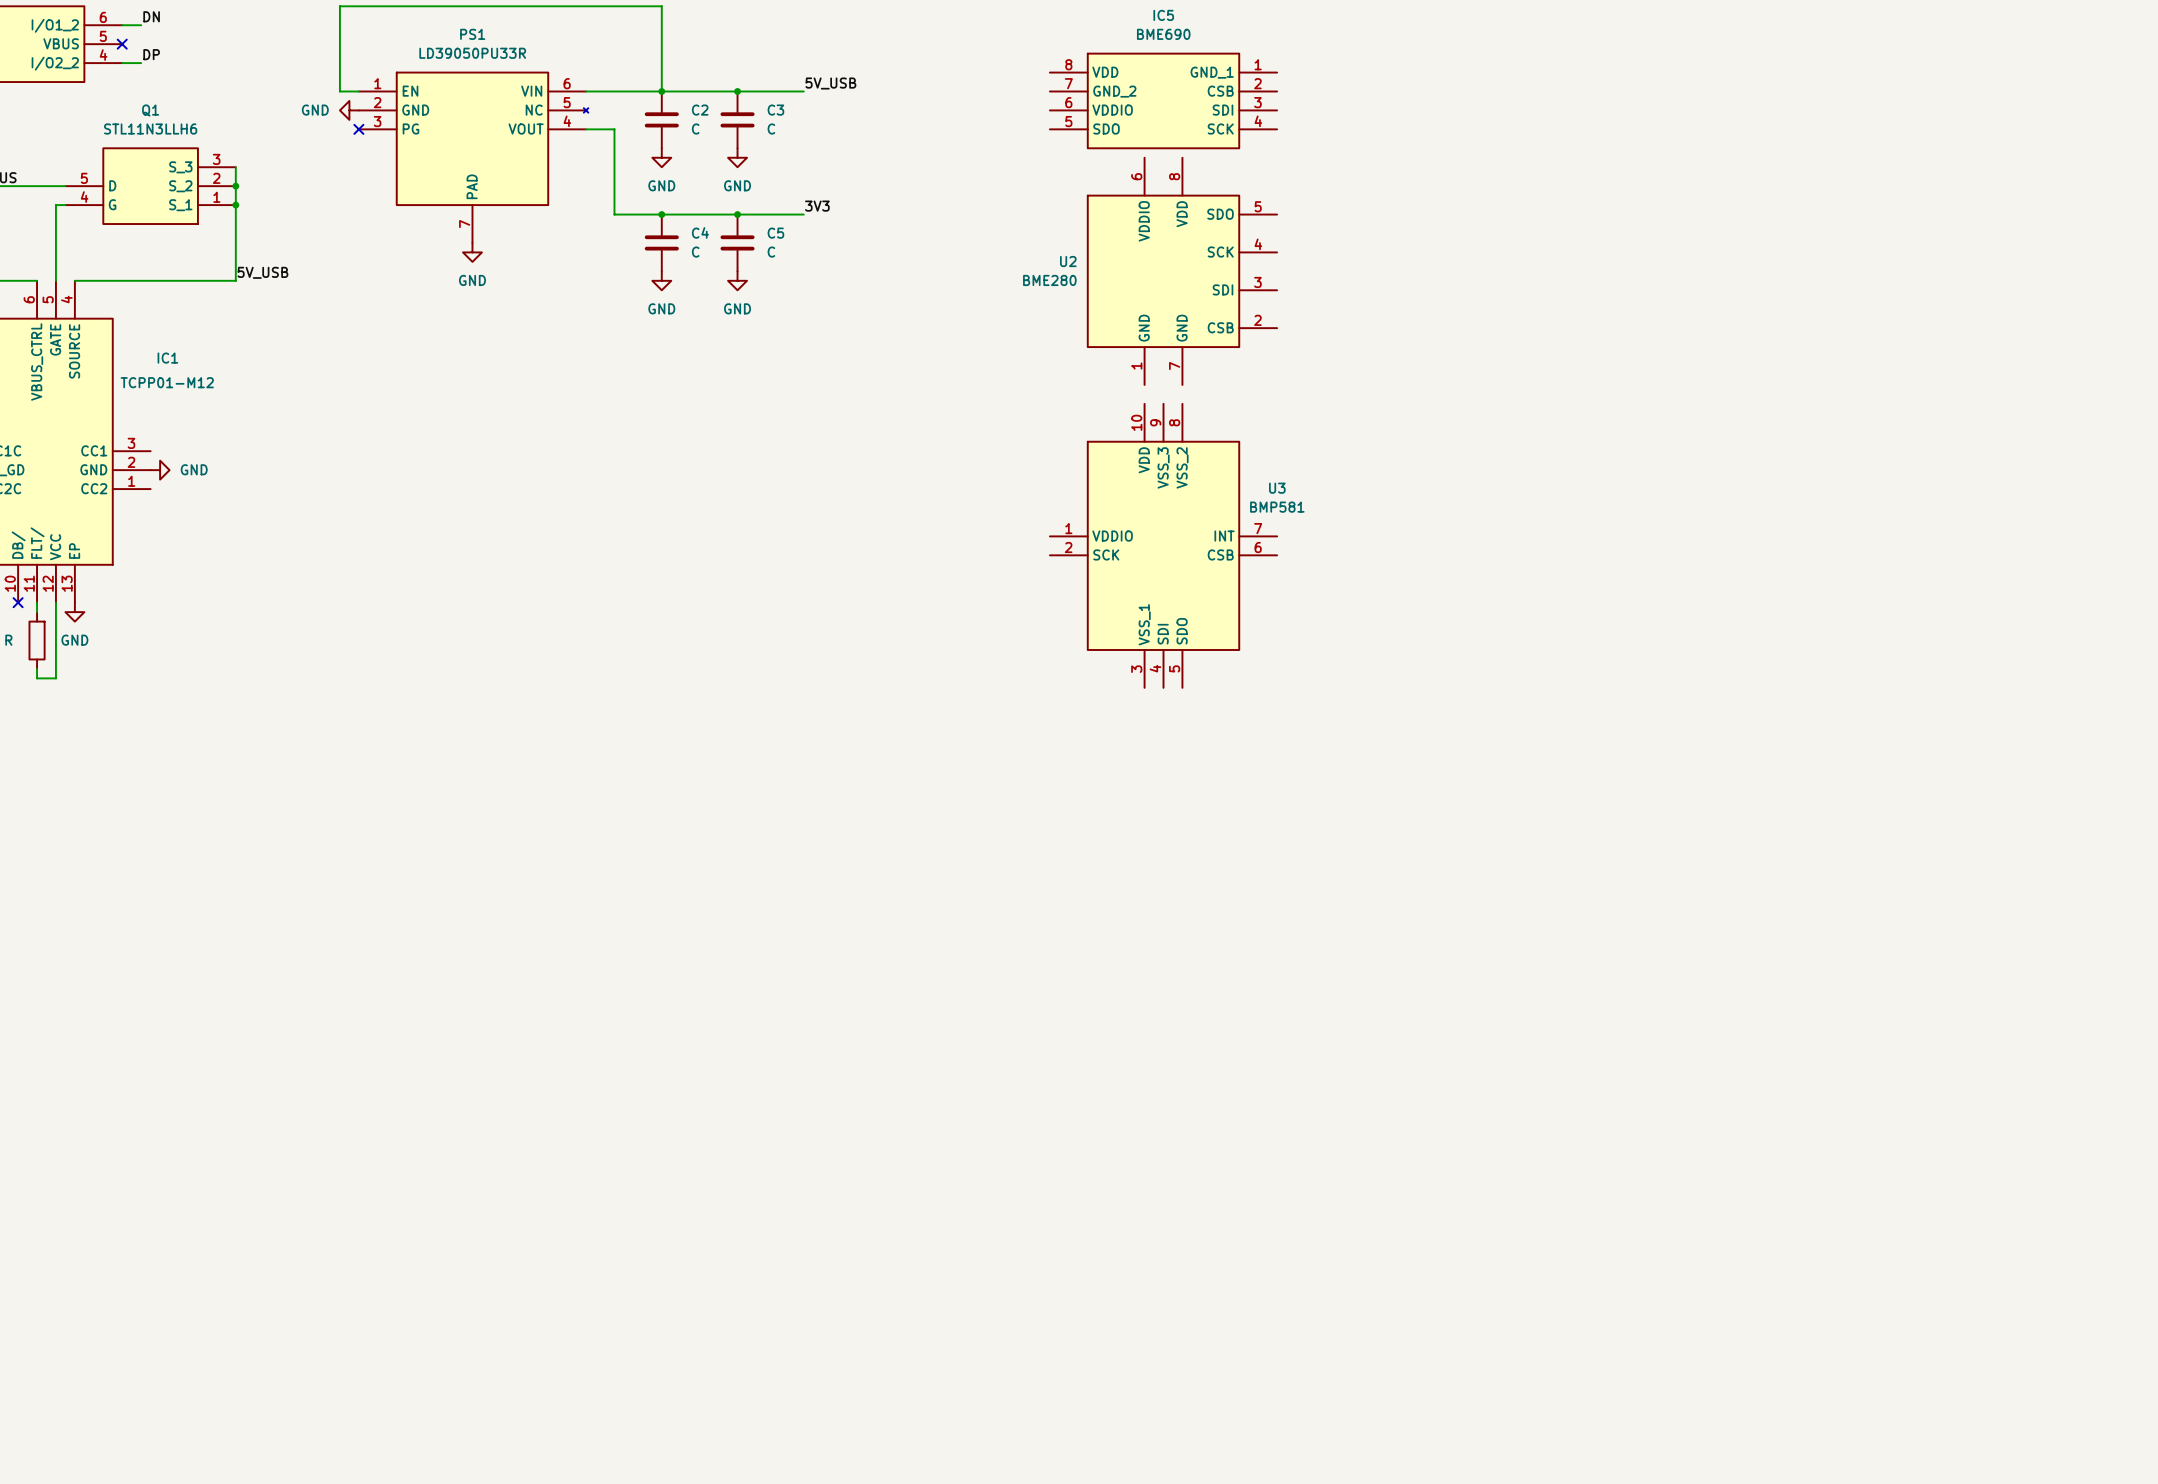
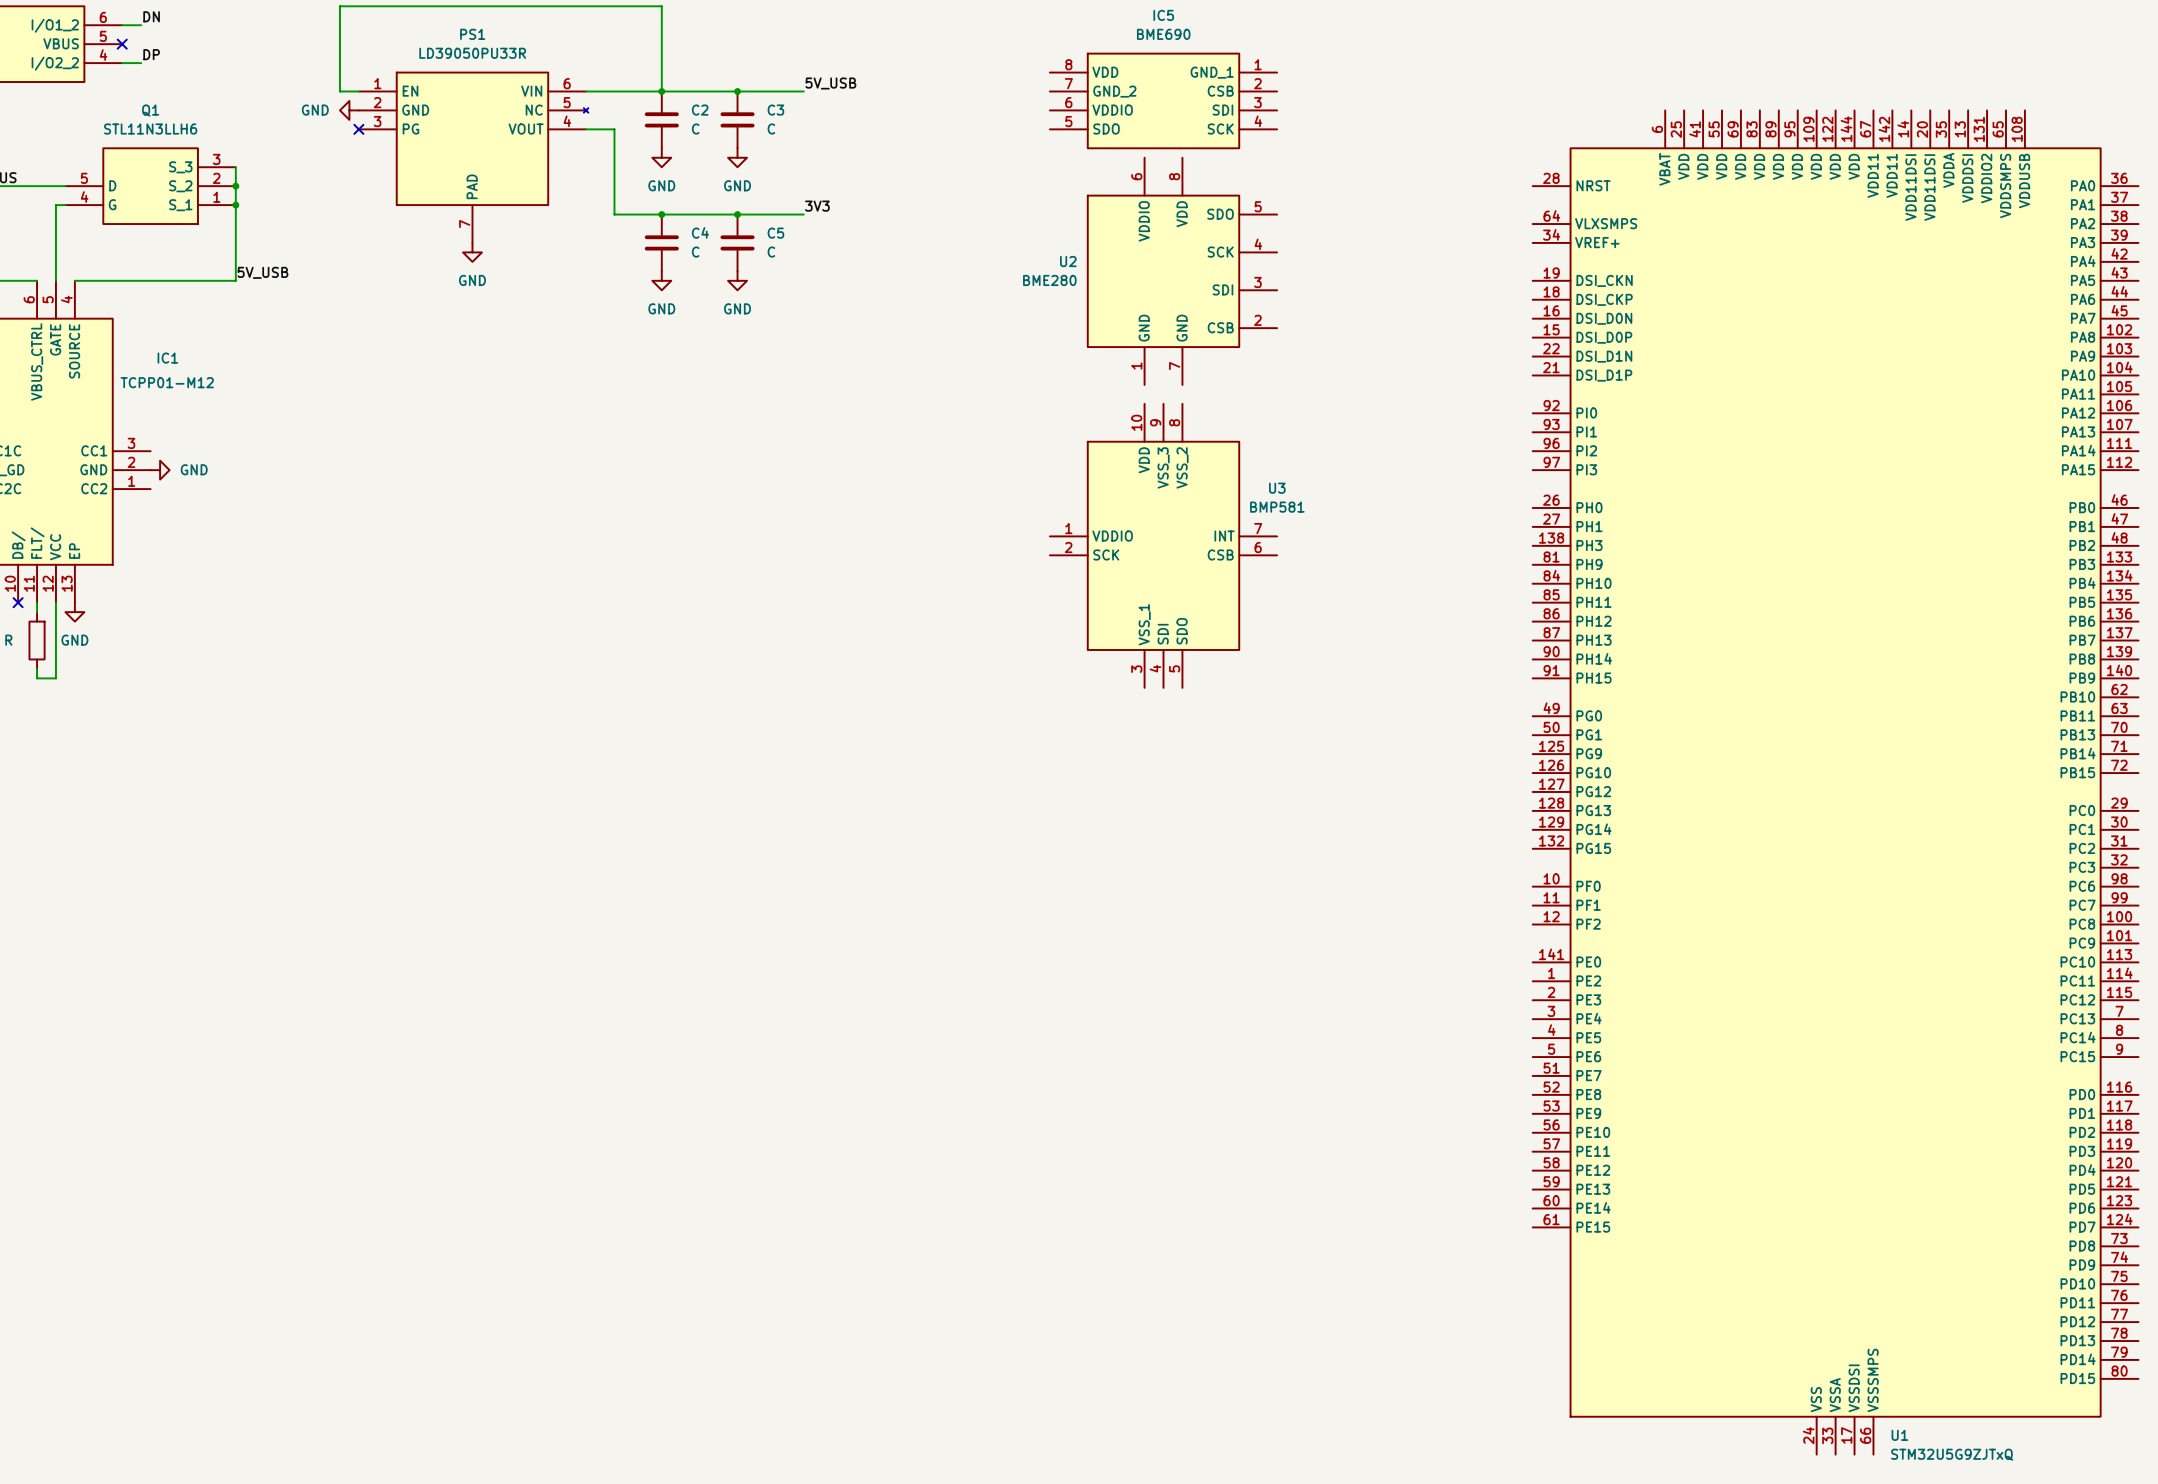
U1: none -> STM32U5G9ZJTxQ (1835, 782)

